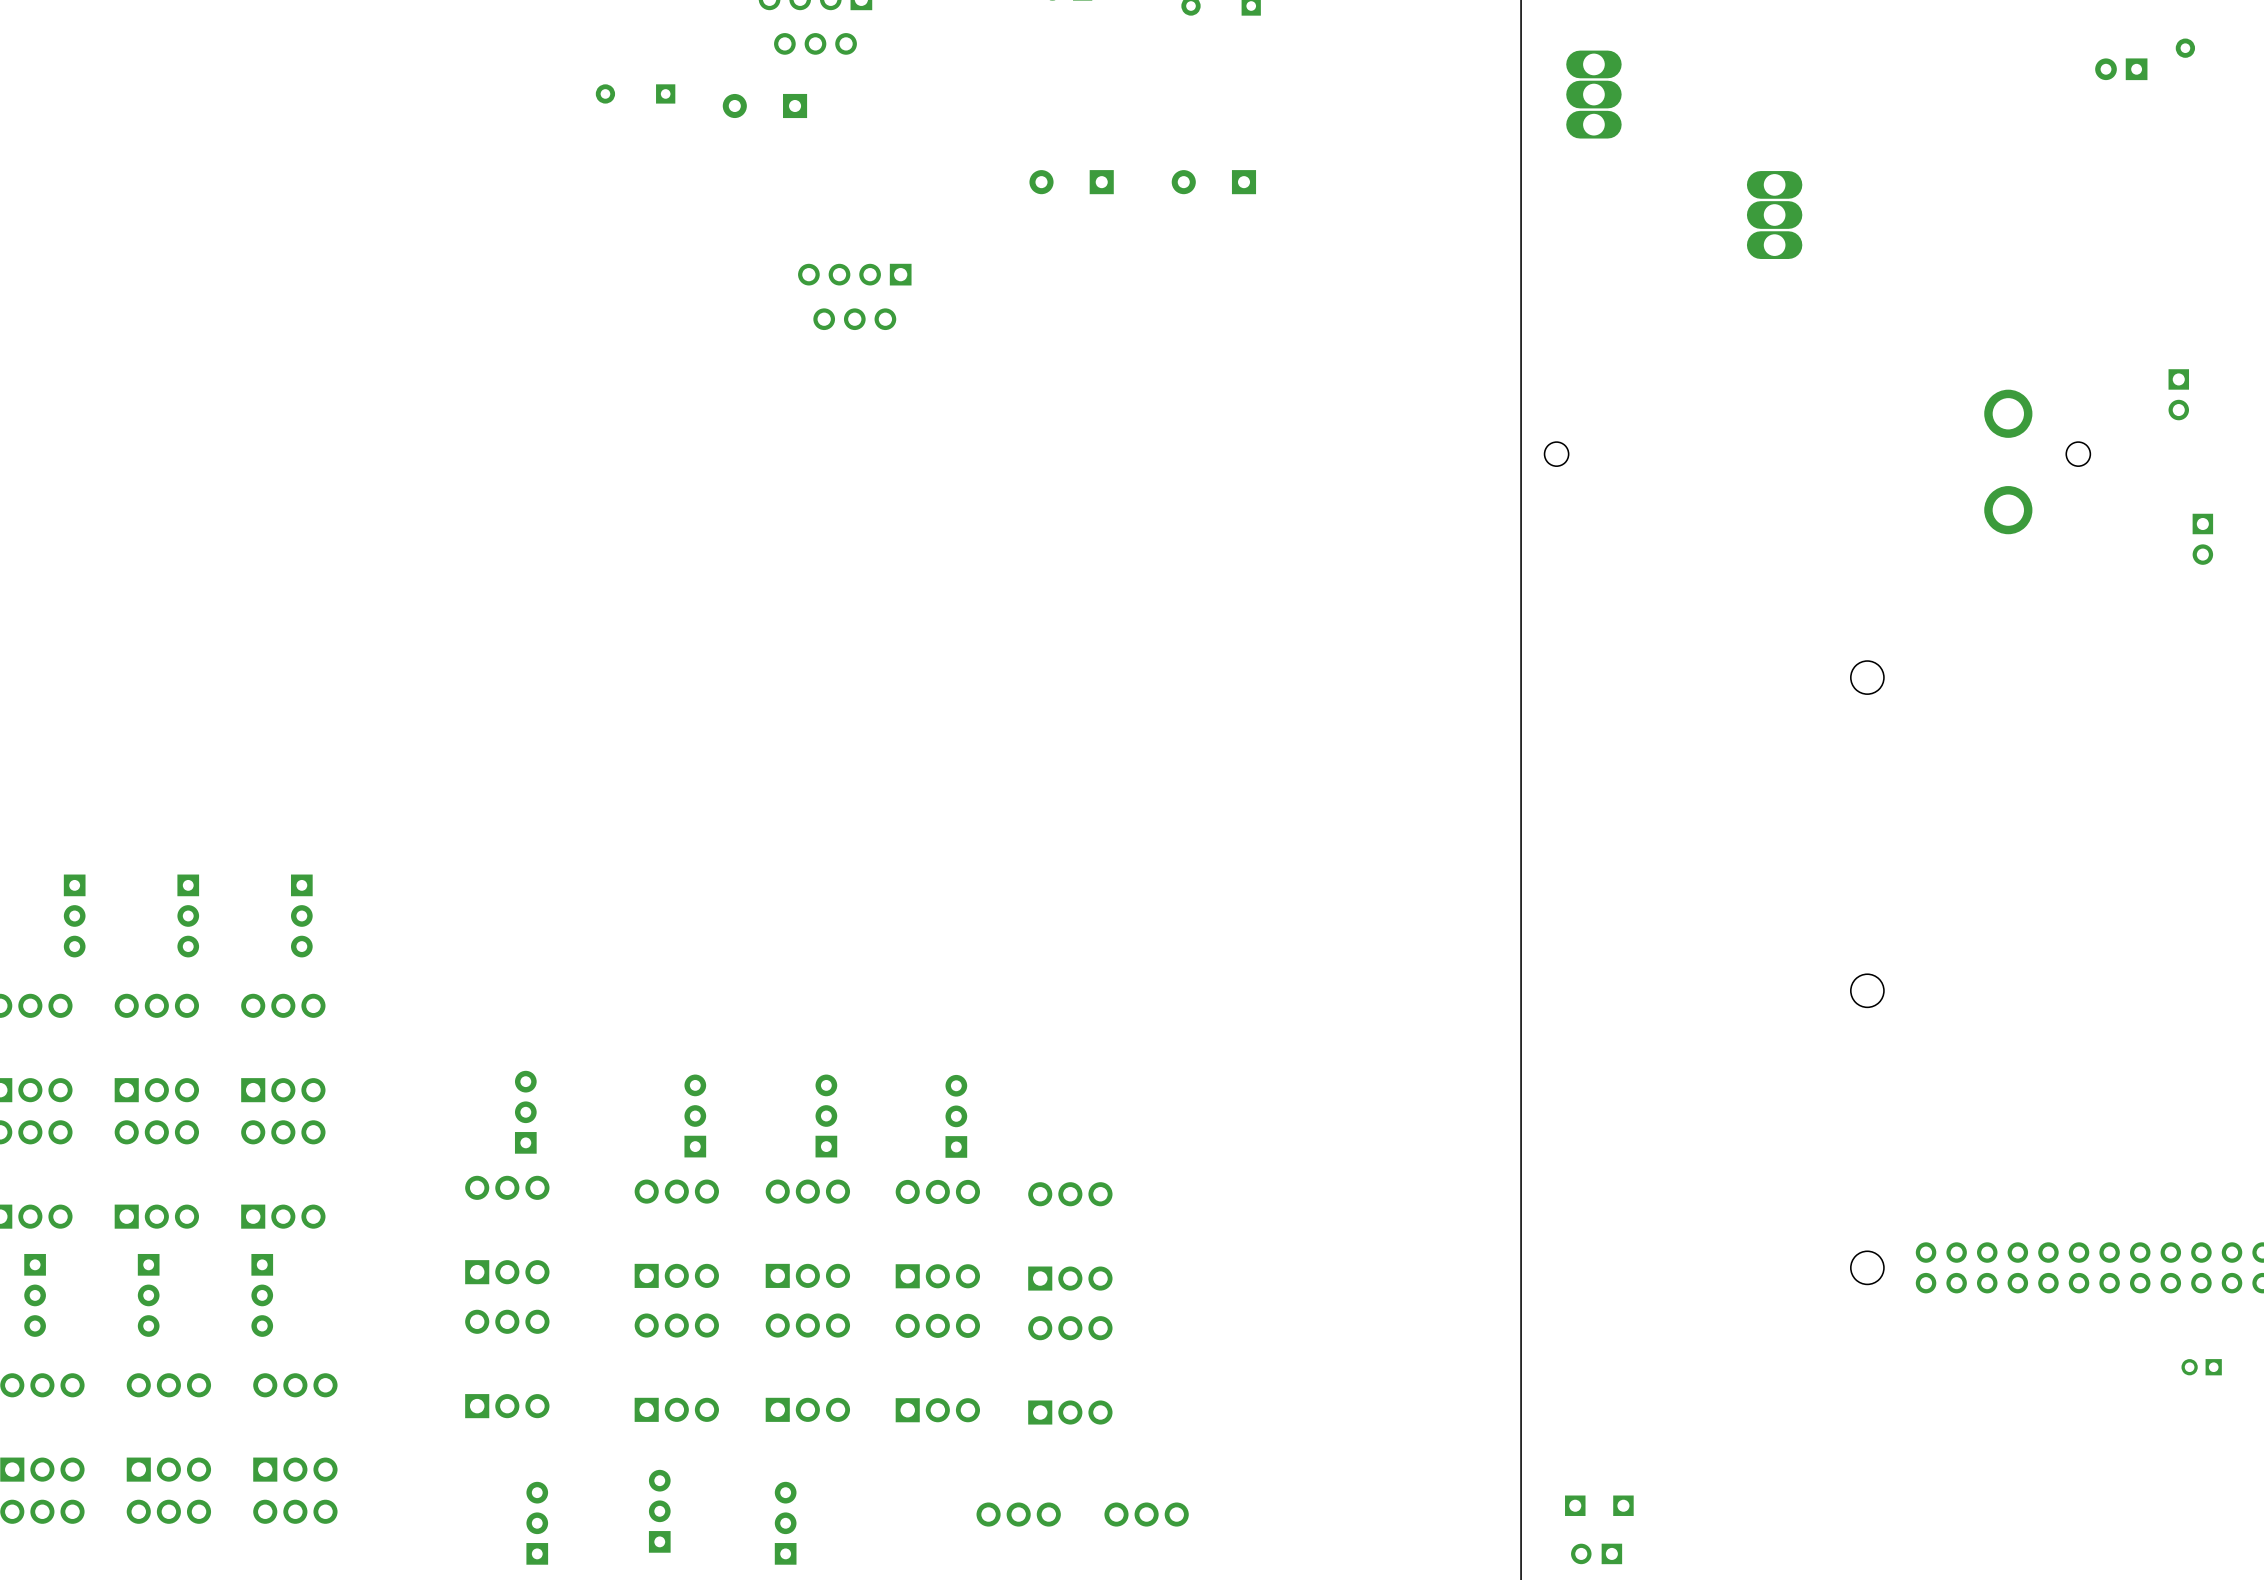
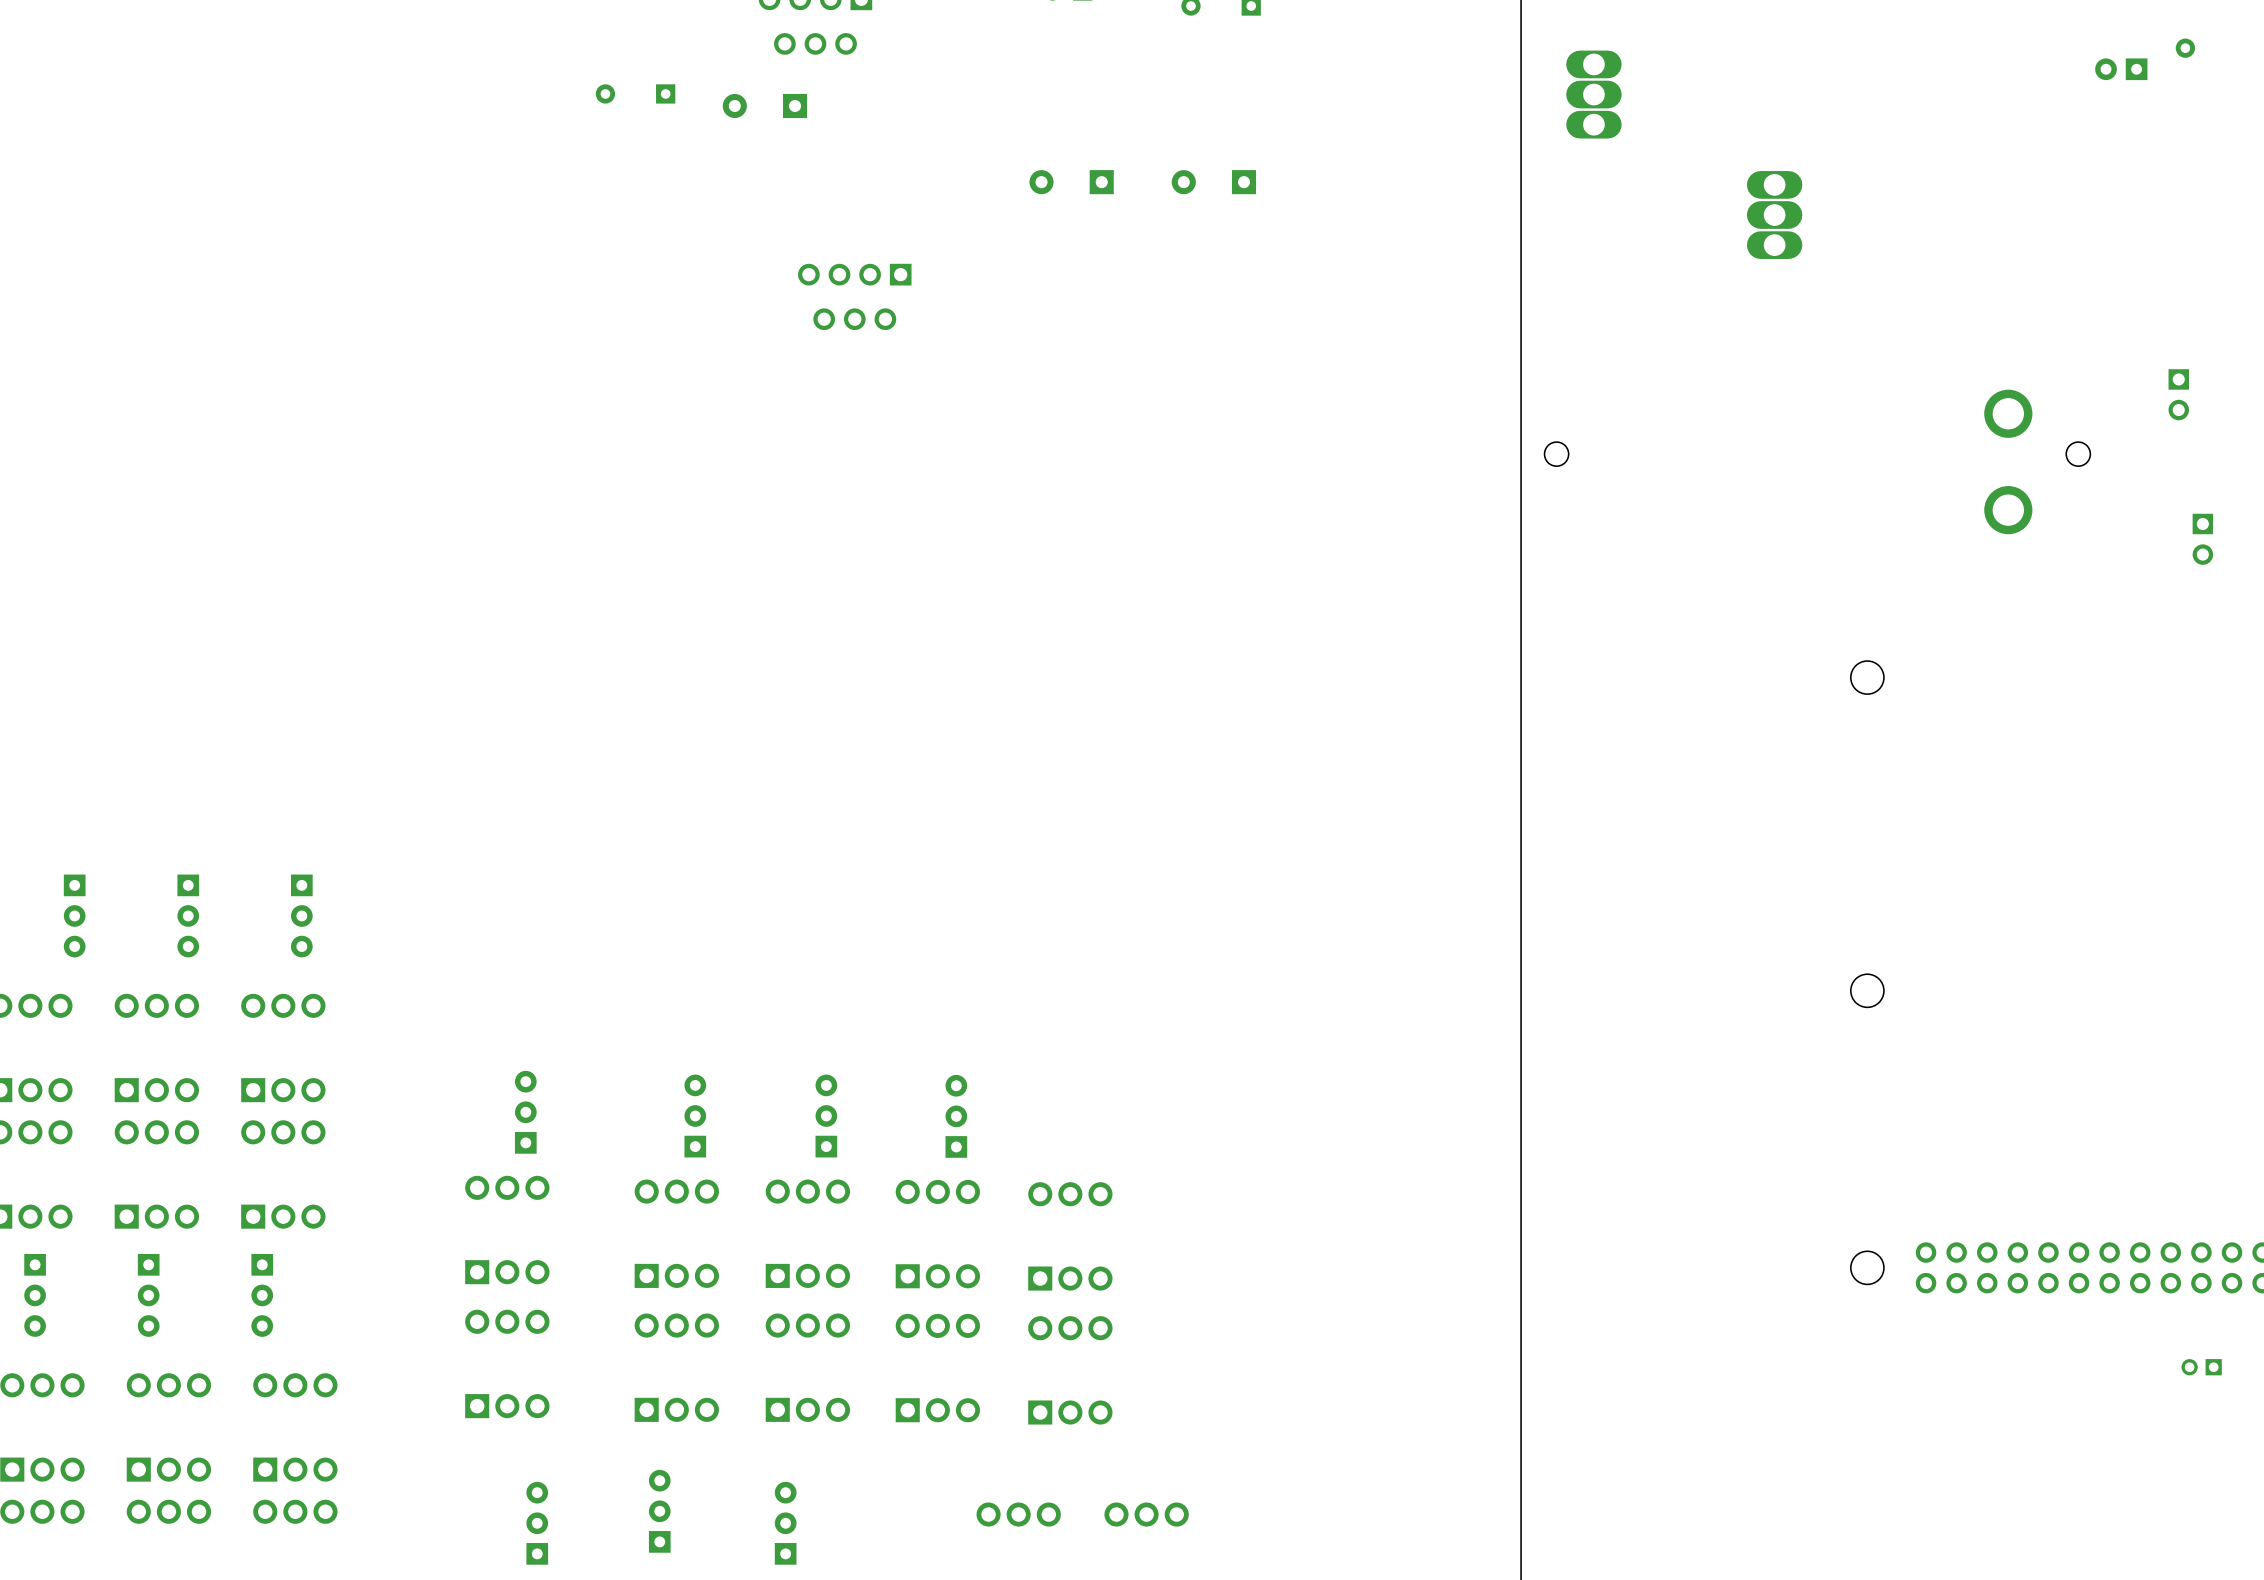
part: (1575, 1505) -> none
part: (1623, 1505) -> none
part: (1596, 1553) -> none

